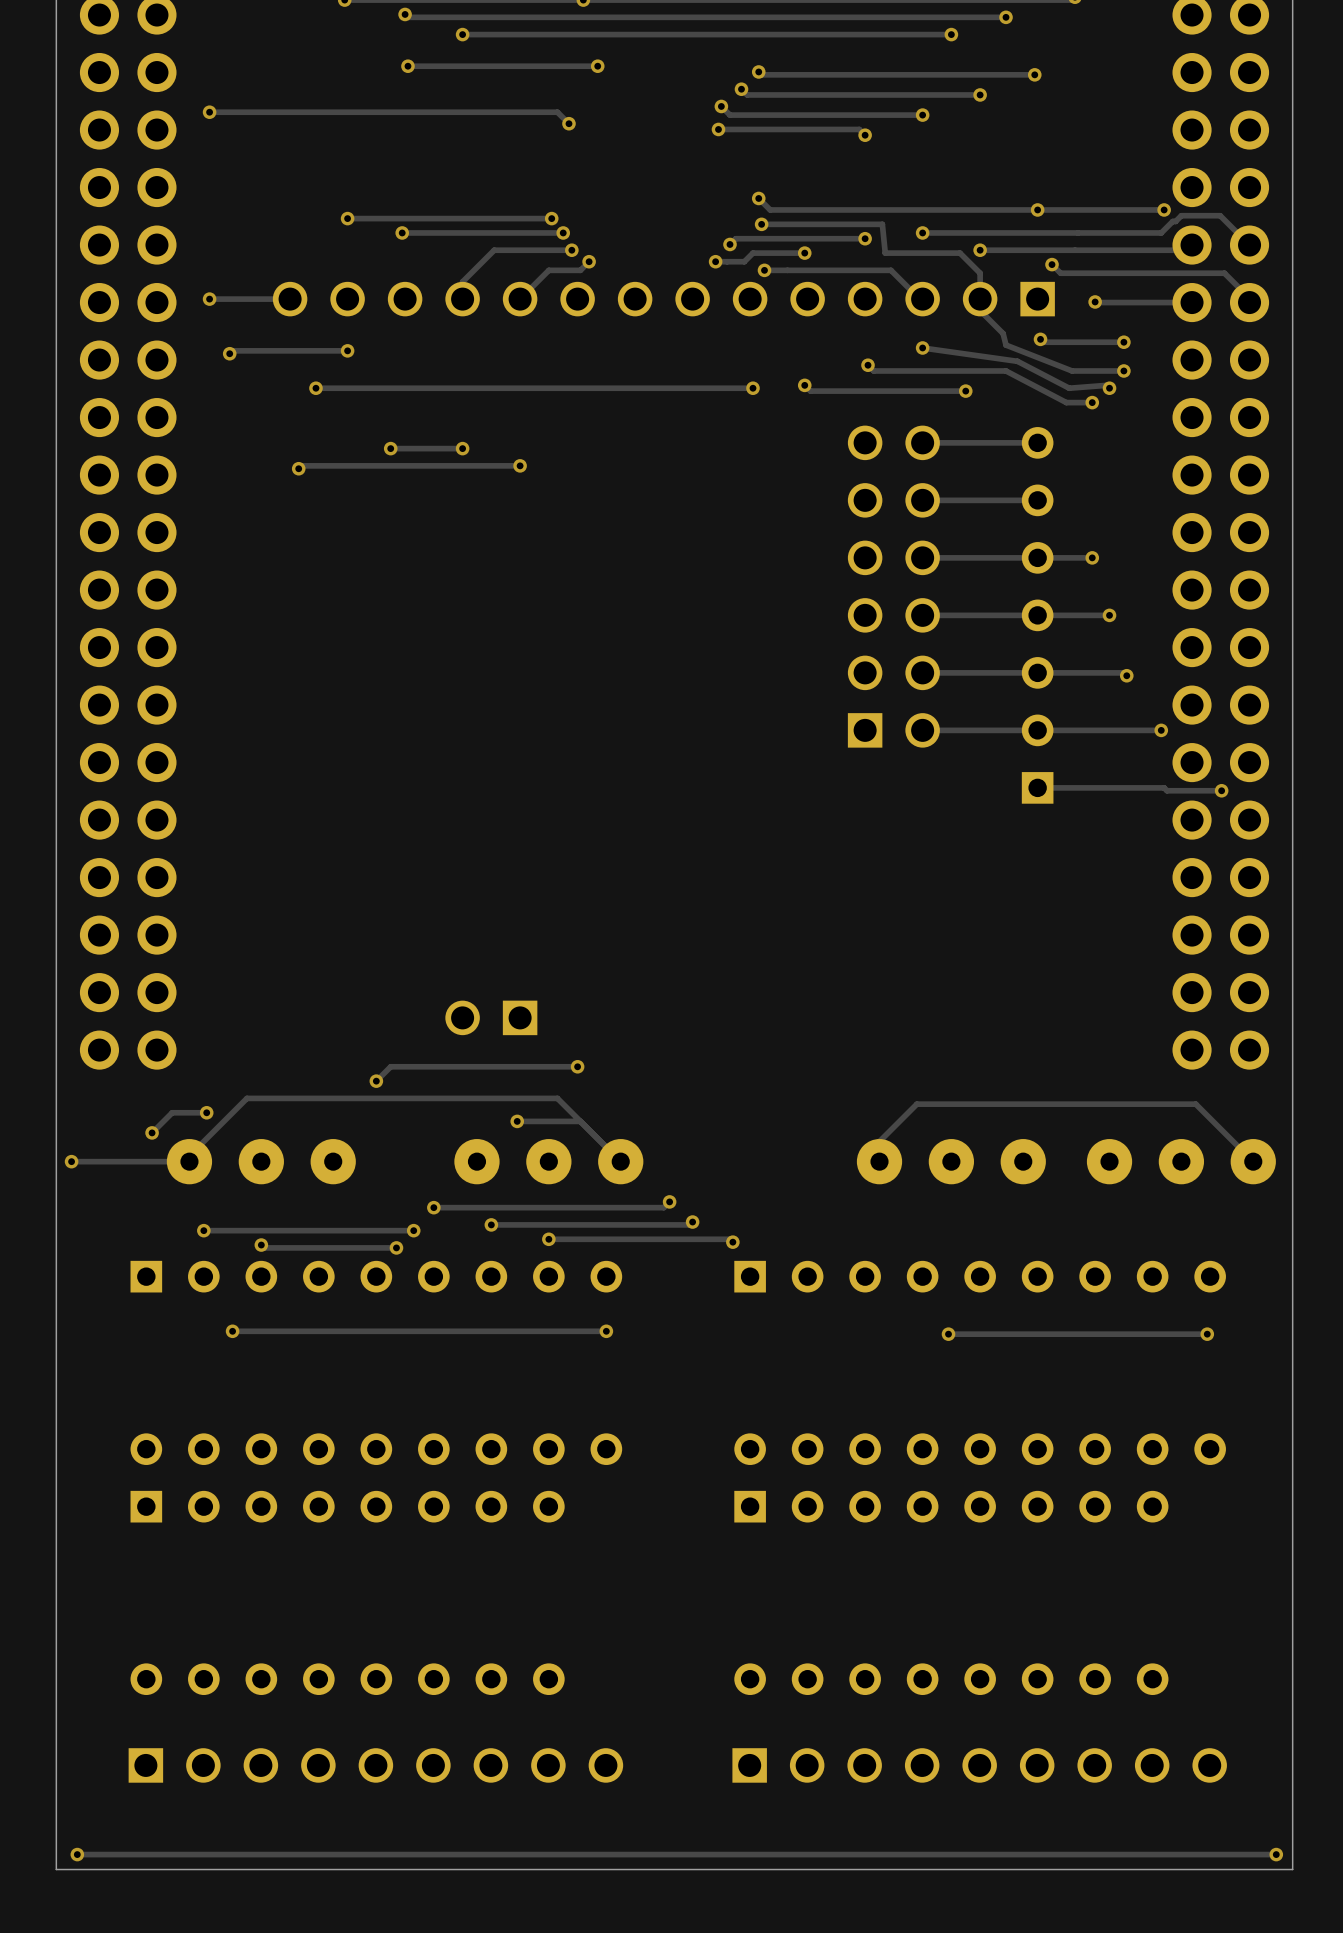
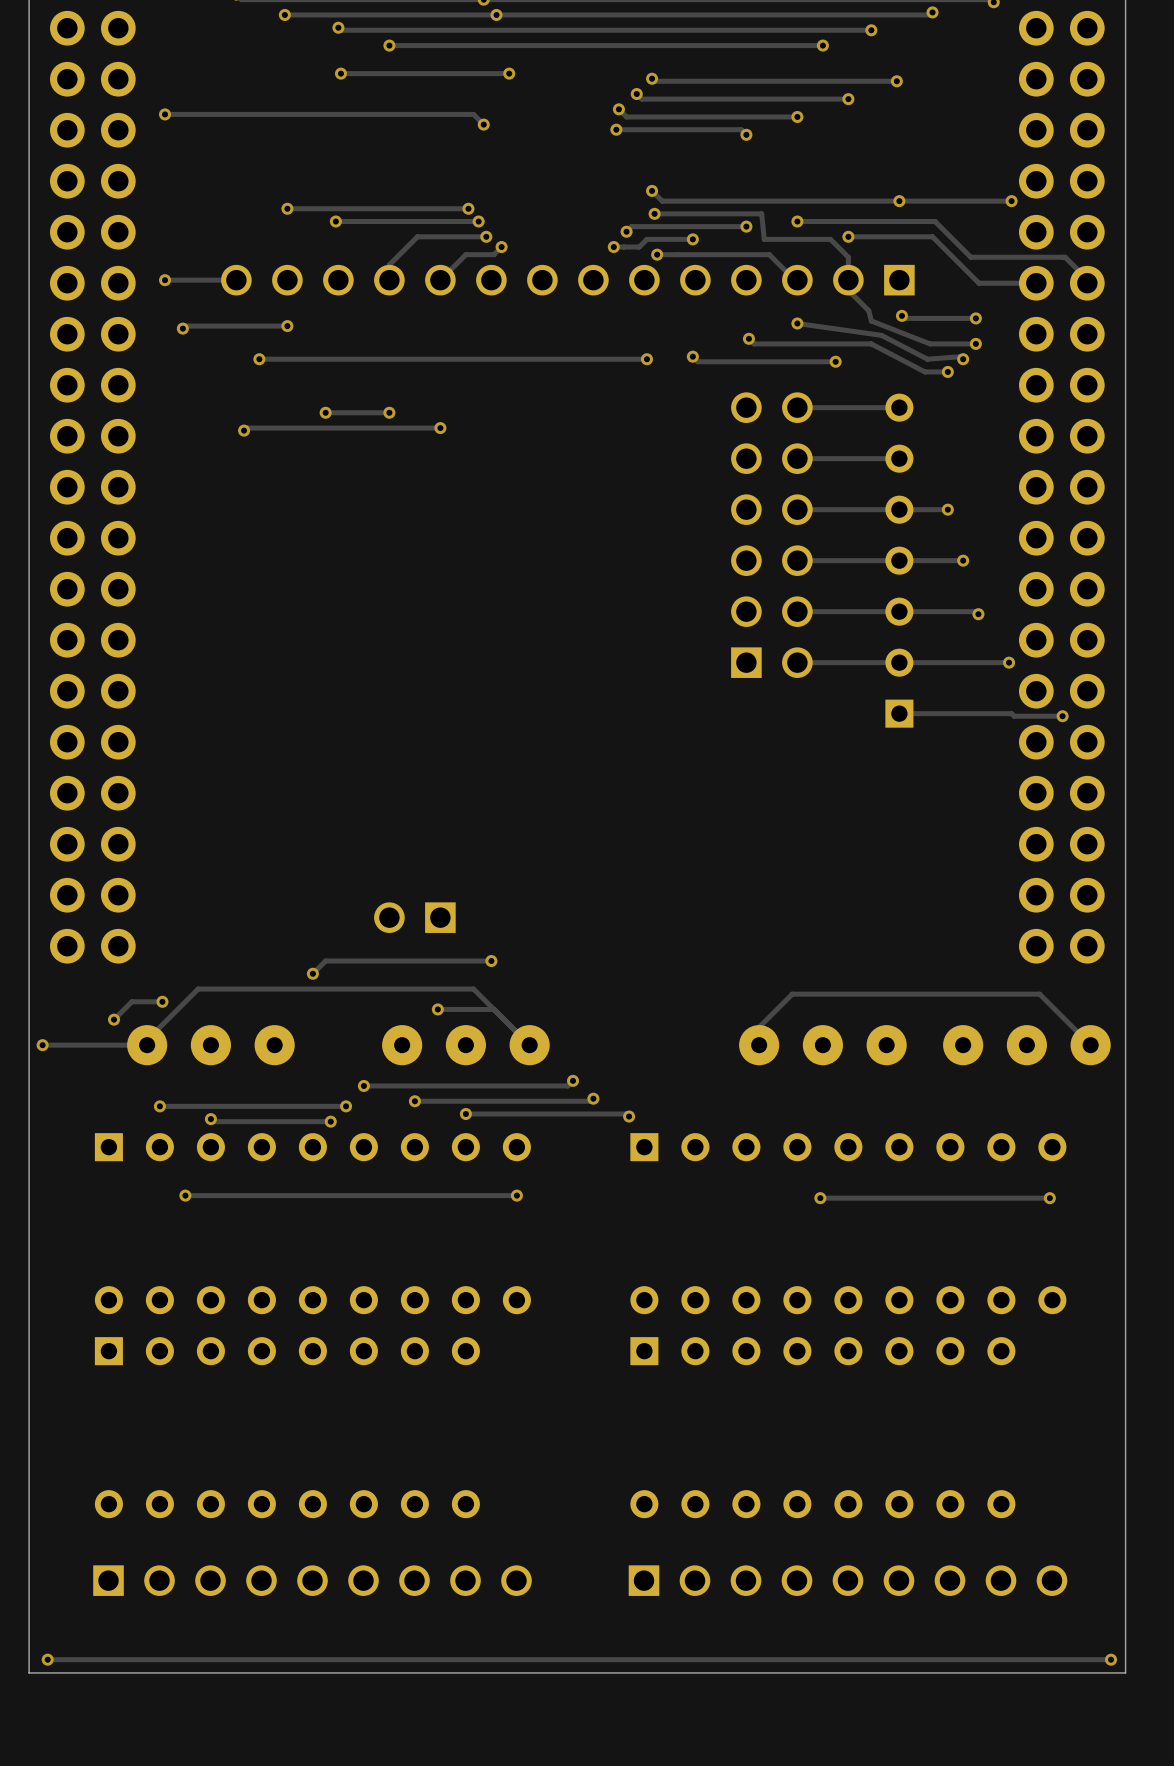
track: (1077, 232) (1161, 232) (1181, 215) (1220, 215) (1249, 245) -> none
track: (1192, 245) (1186, 250) (1075, 250) -> none
track: (1052, 264) (1060, 273) (1118, 273) -> (935, 221) (970, 257)
via: (1052, 264) -> none
track: (1095, 301) (1127, 302) -> (932, 236) (978, 283)
via: (1095, 301) -> none

